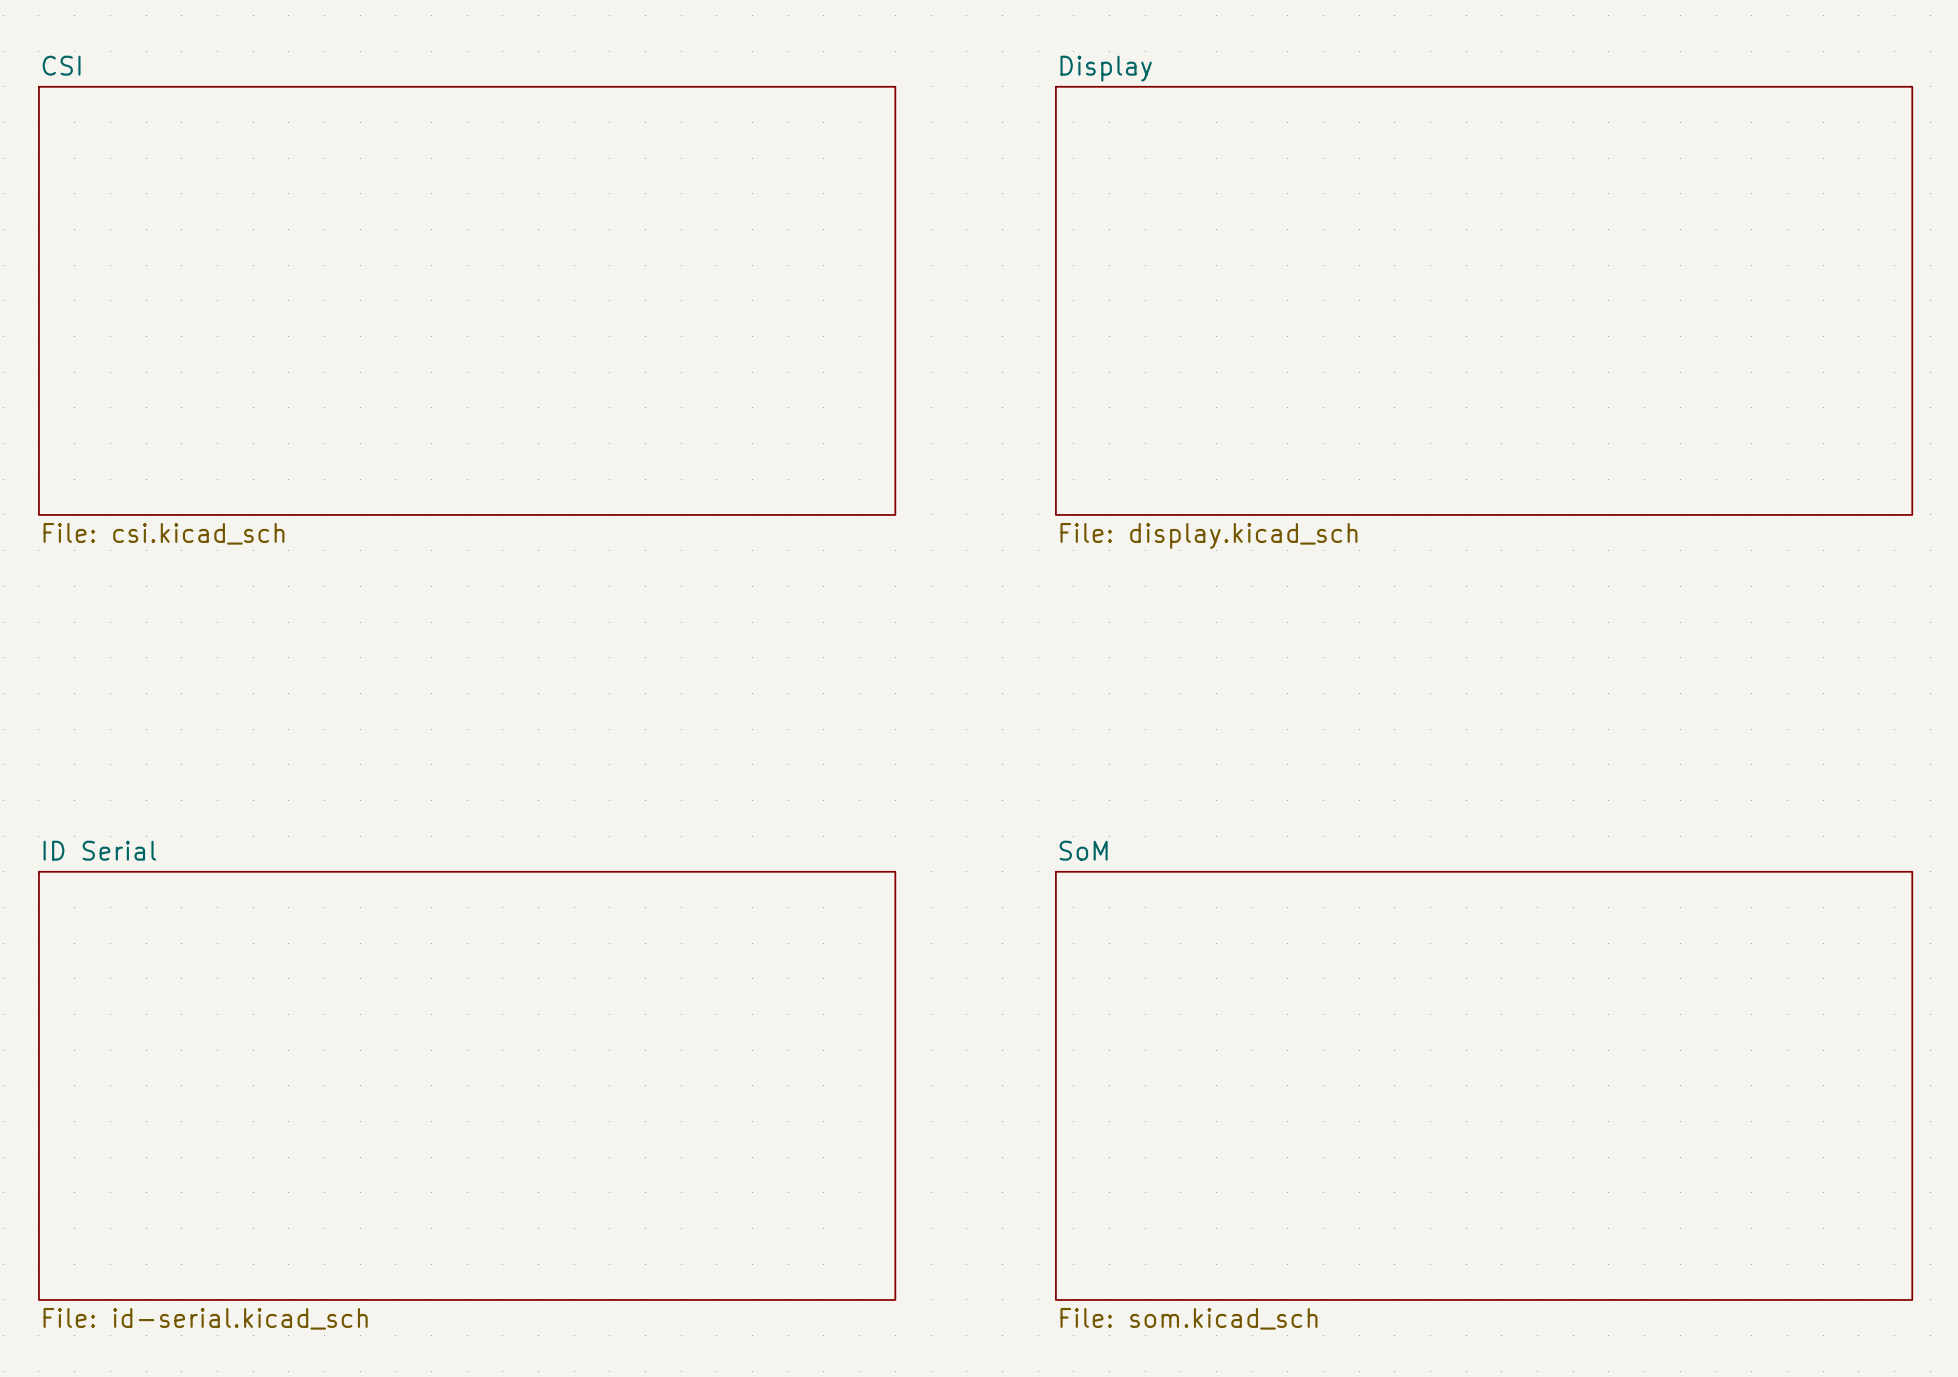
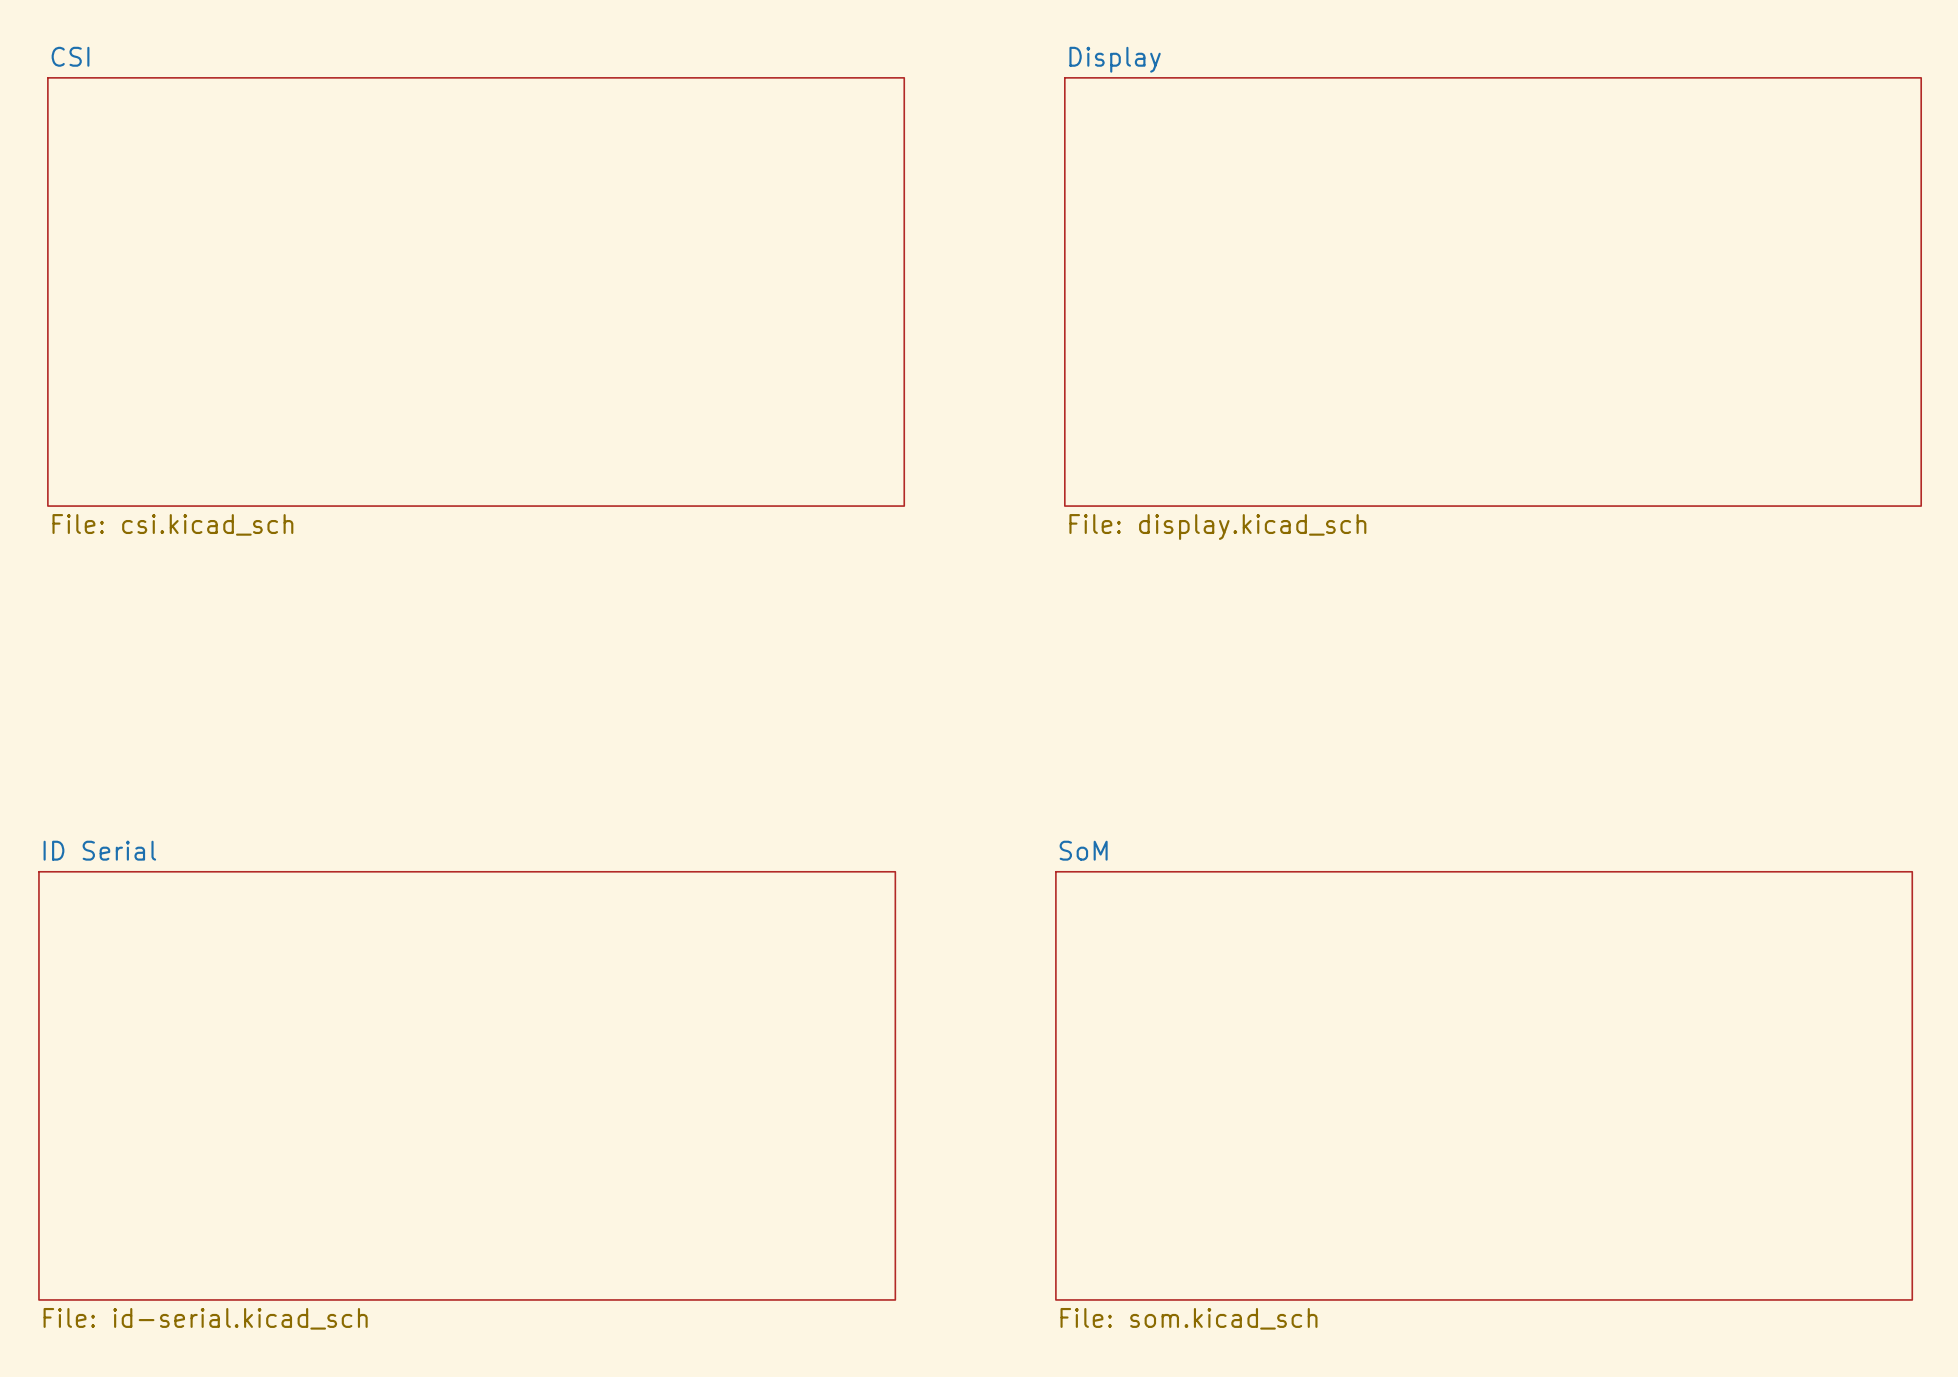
sheet CSI position: (467, 300) -> (476, 291)
sheet Display position: (1484, 300) -> (1493, 291)

